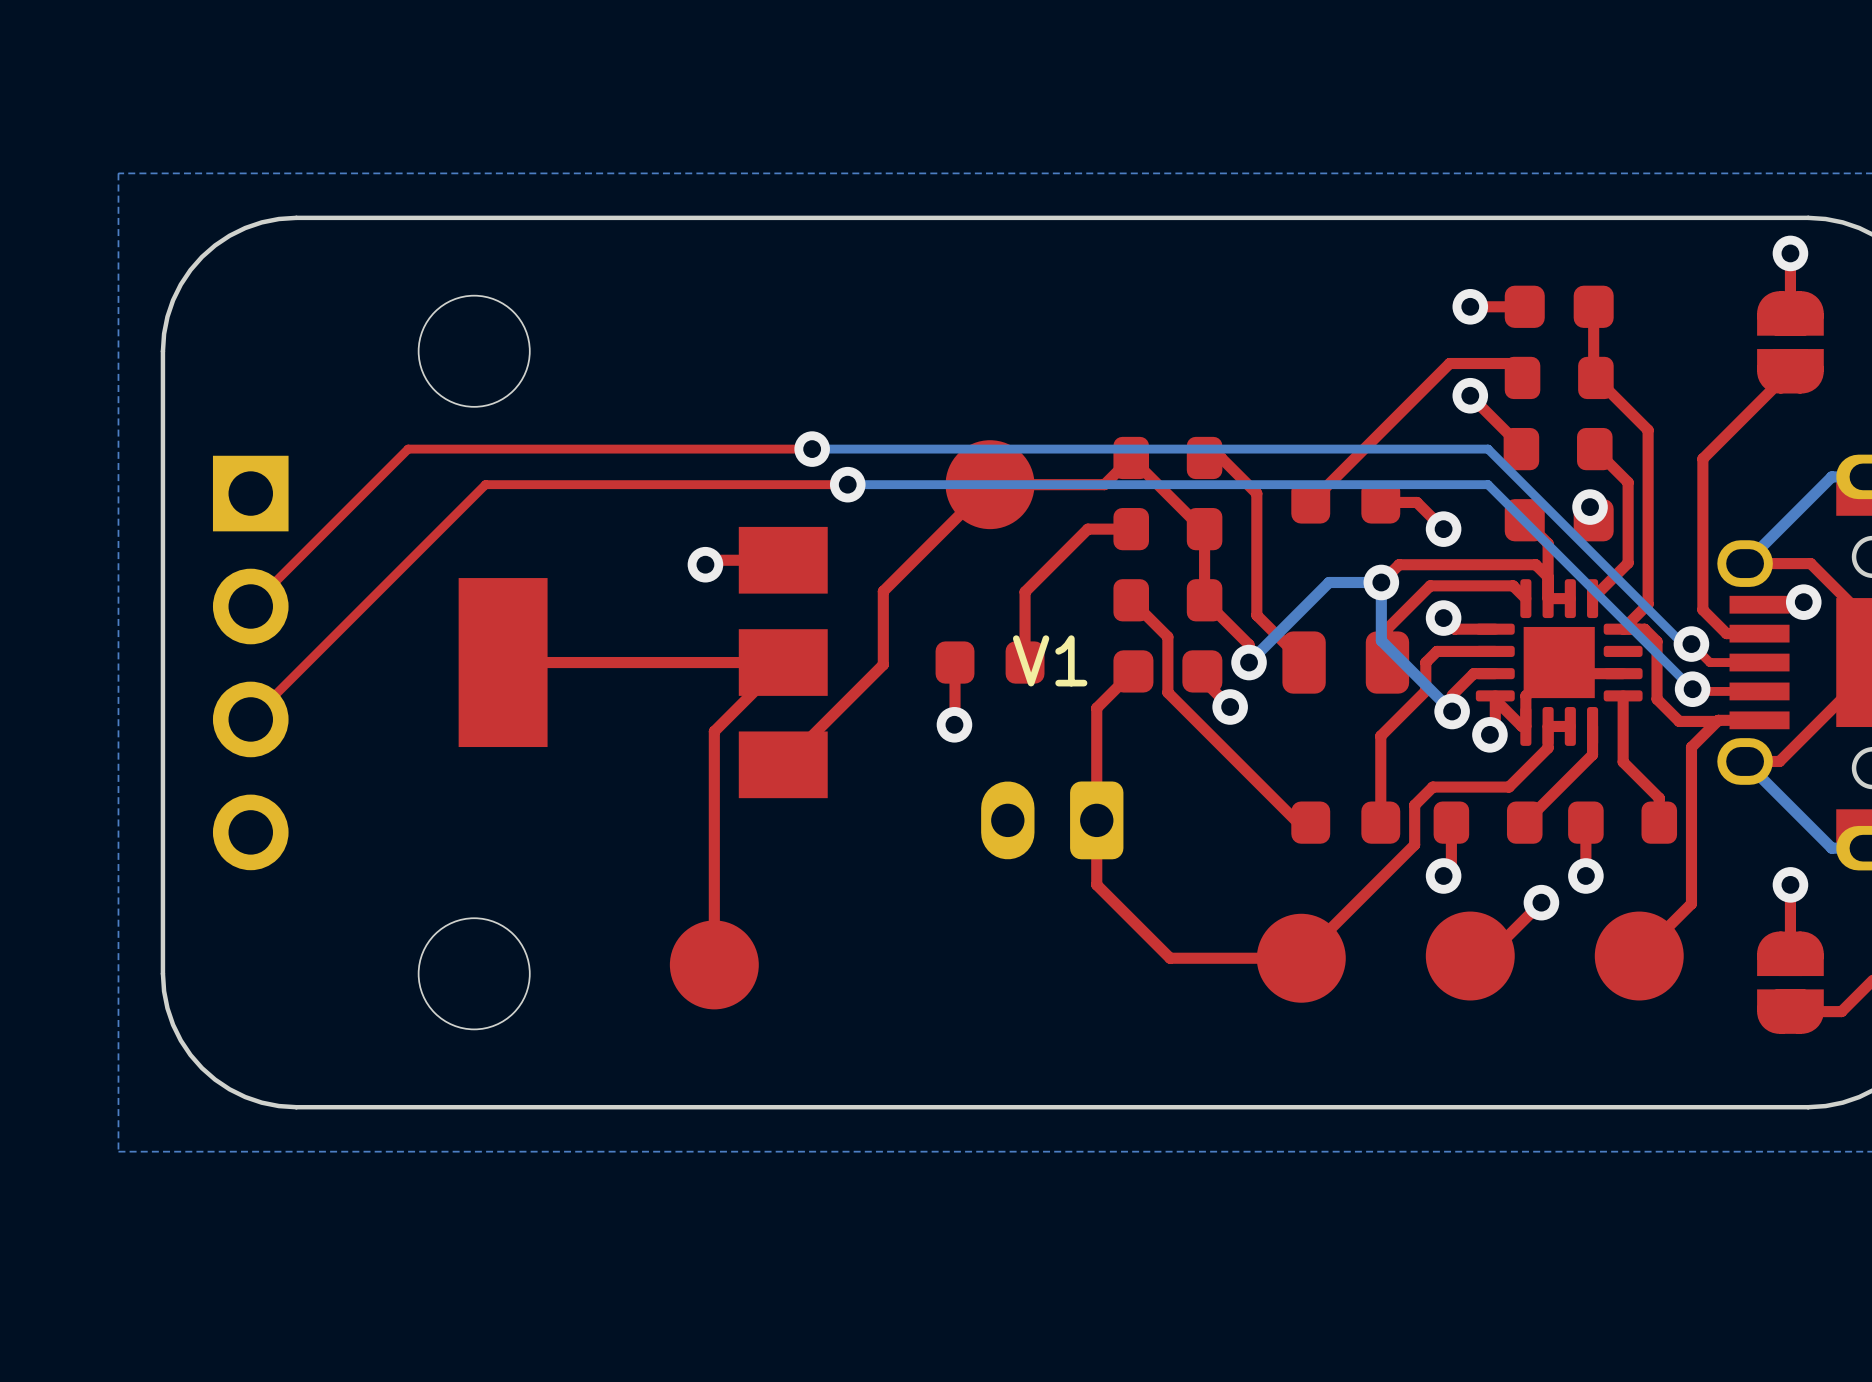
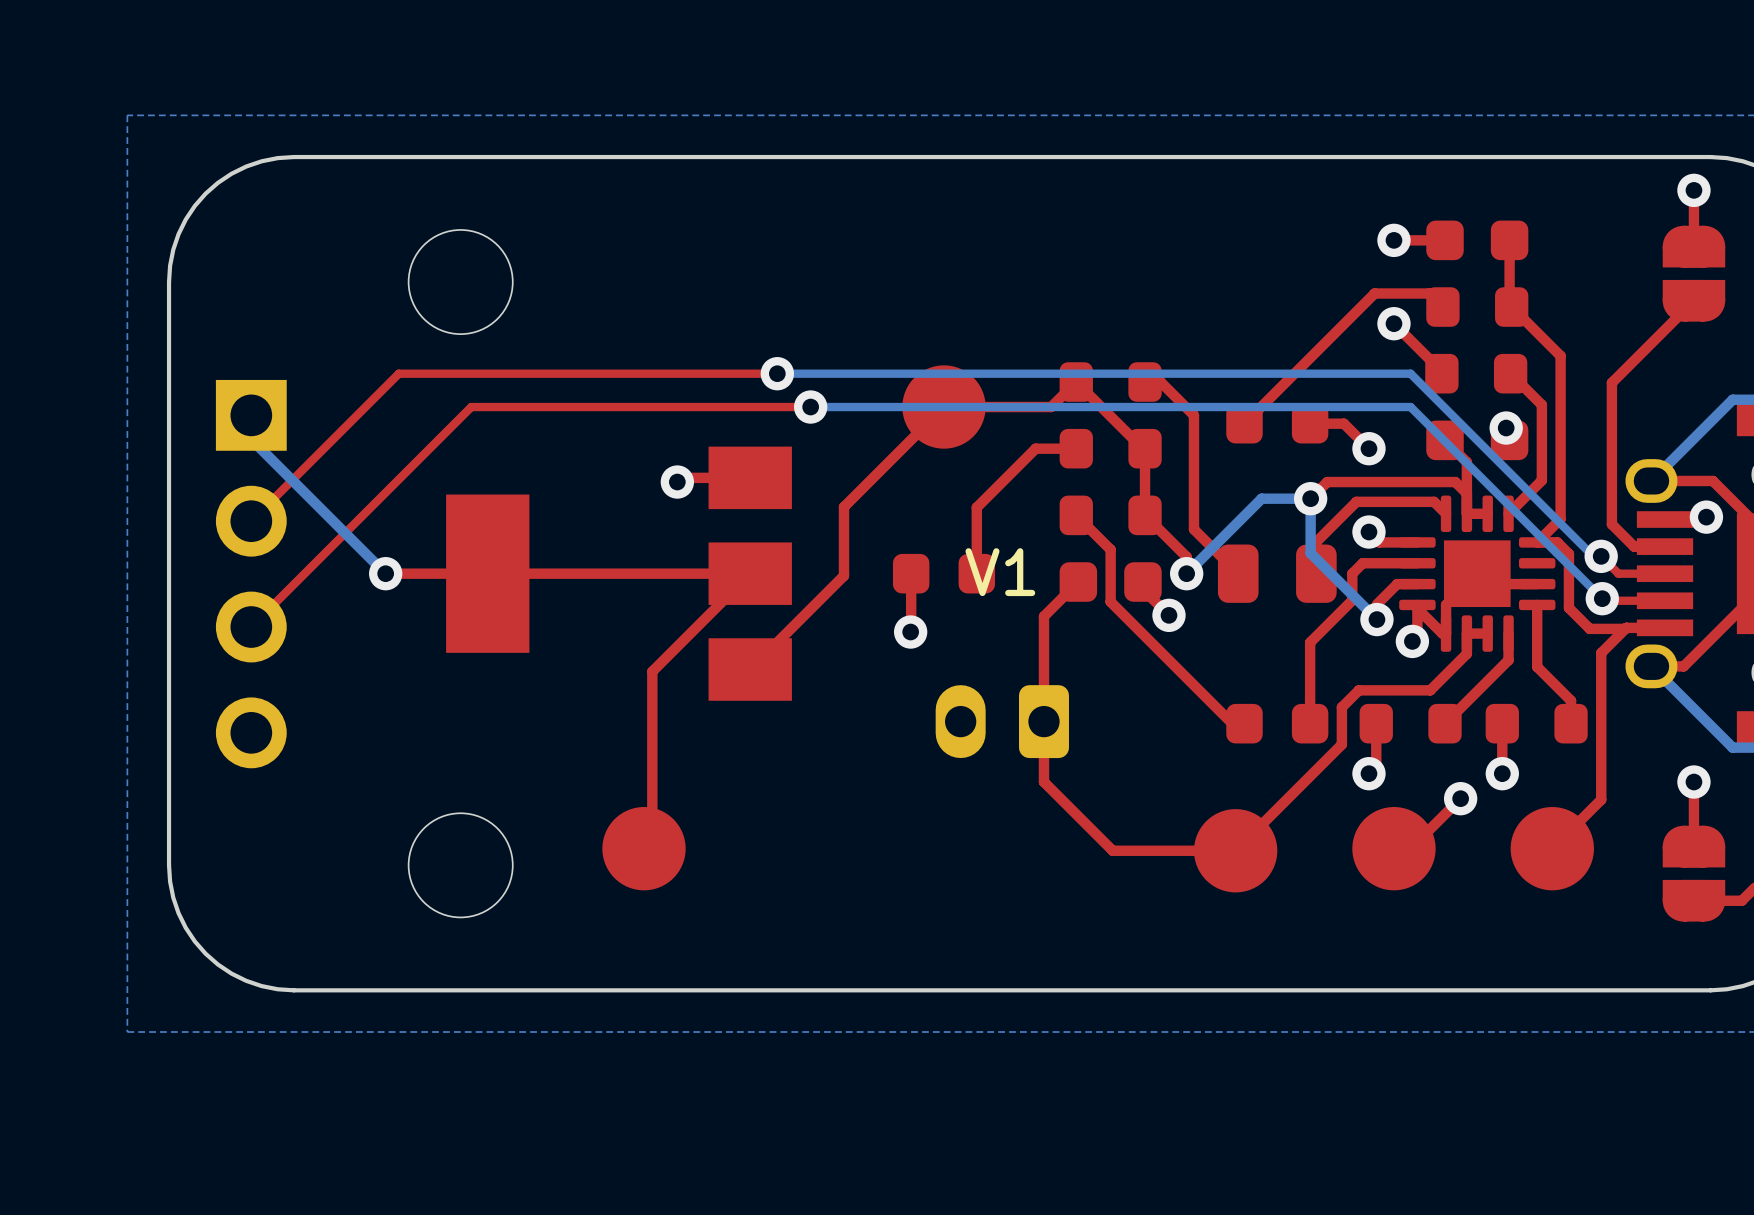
bottom track: none -> (251, 415) (251, 439) (385, 573)
via: none -> (385, 573)
top track: none -> (487, 573) (385, 573)
top track: (714, 731) (714, 964) -> (685, 638) (652, 671) (652, 848)
part position: (714, 964) -> (644, 848)

